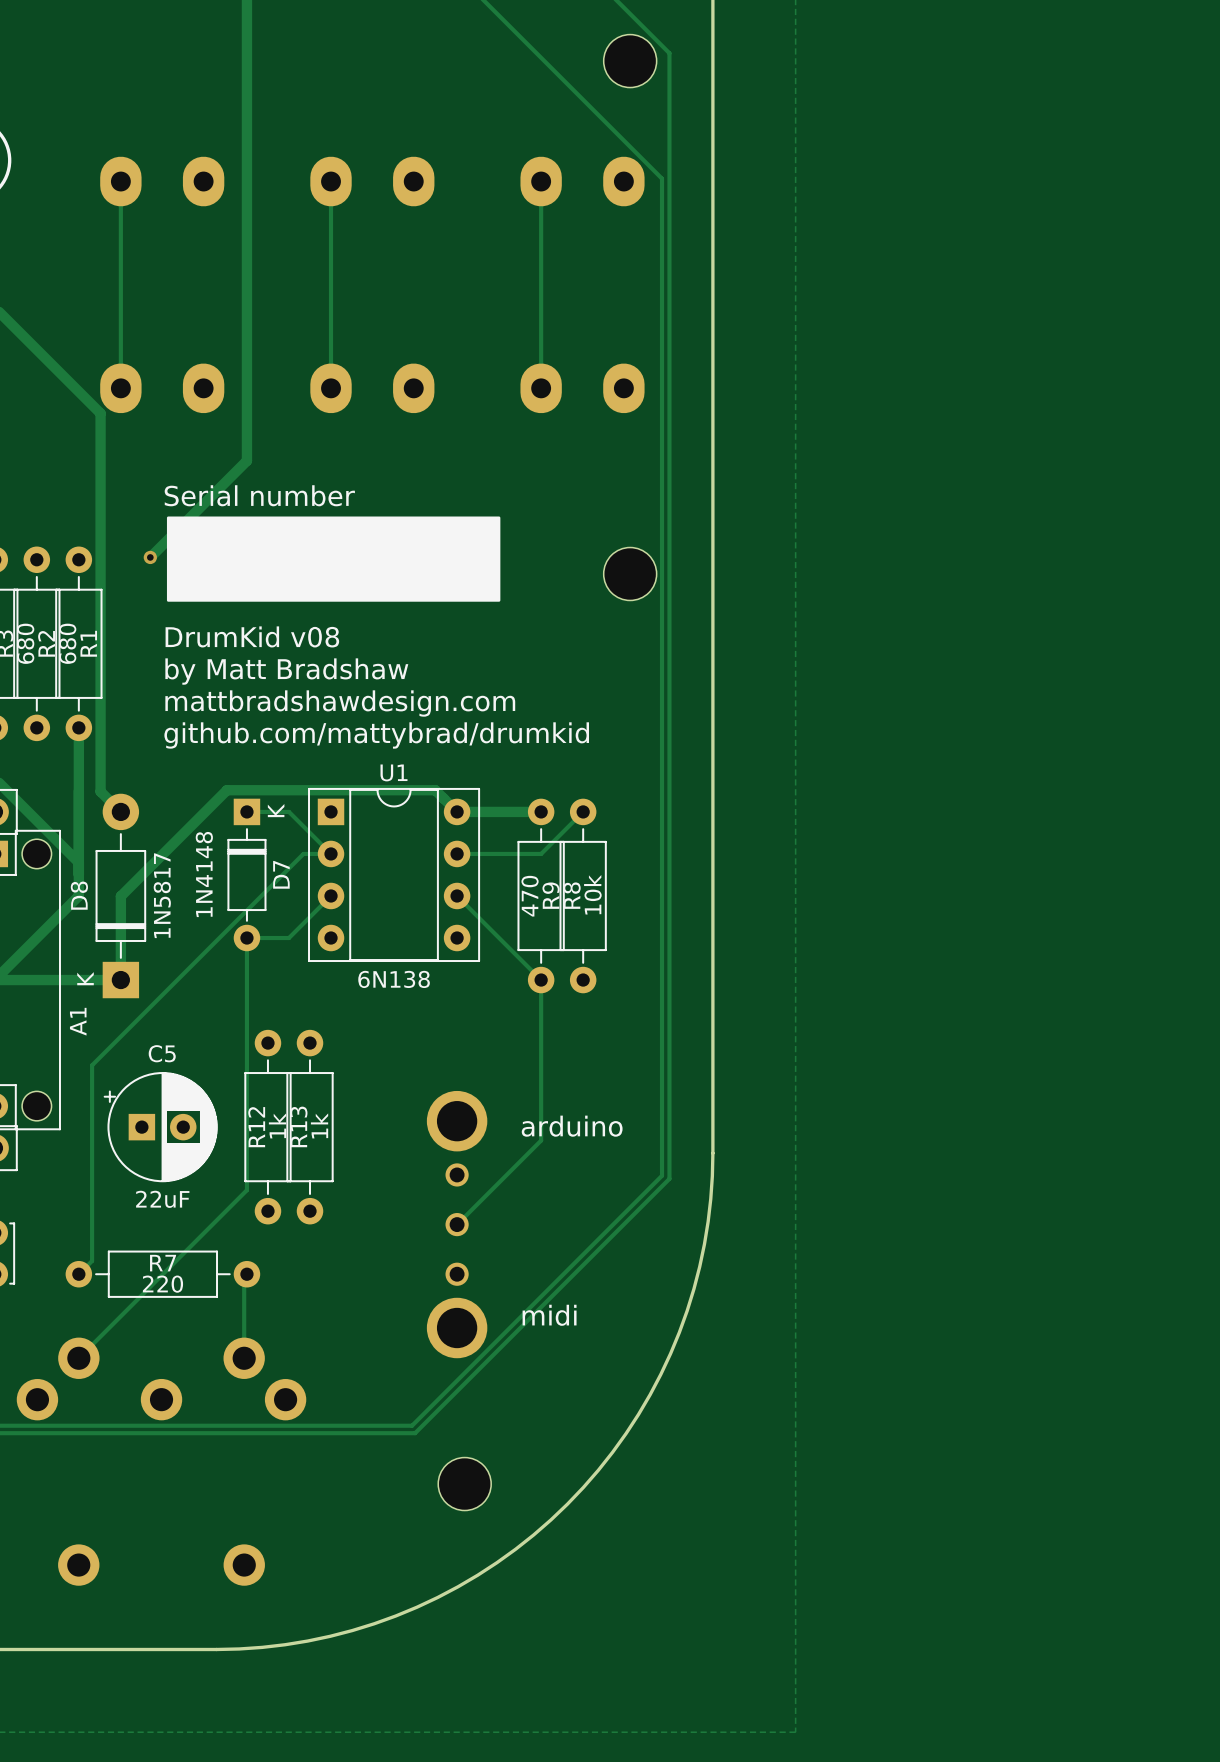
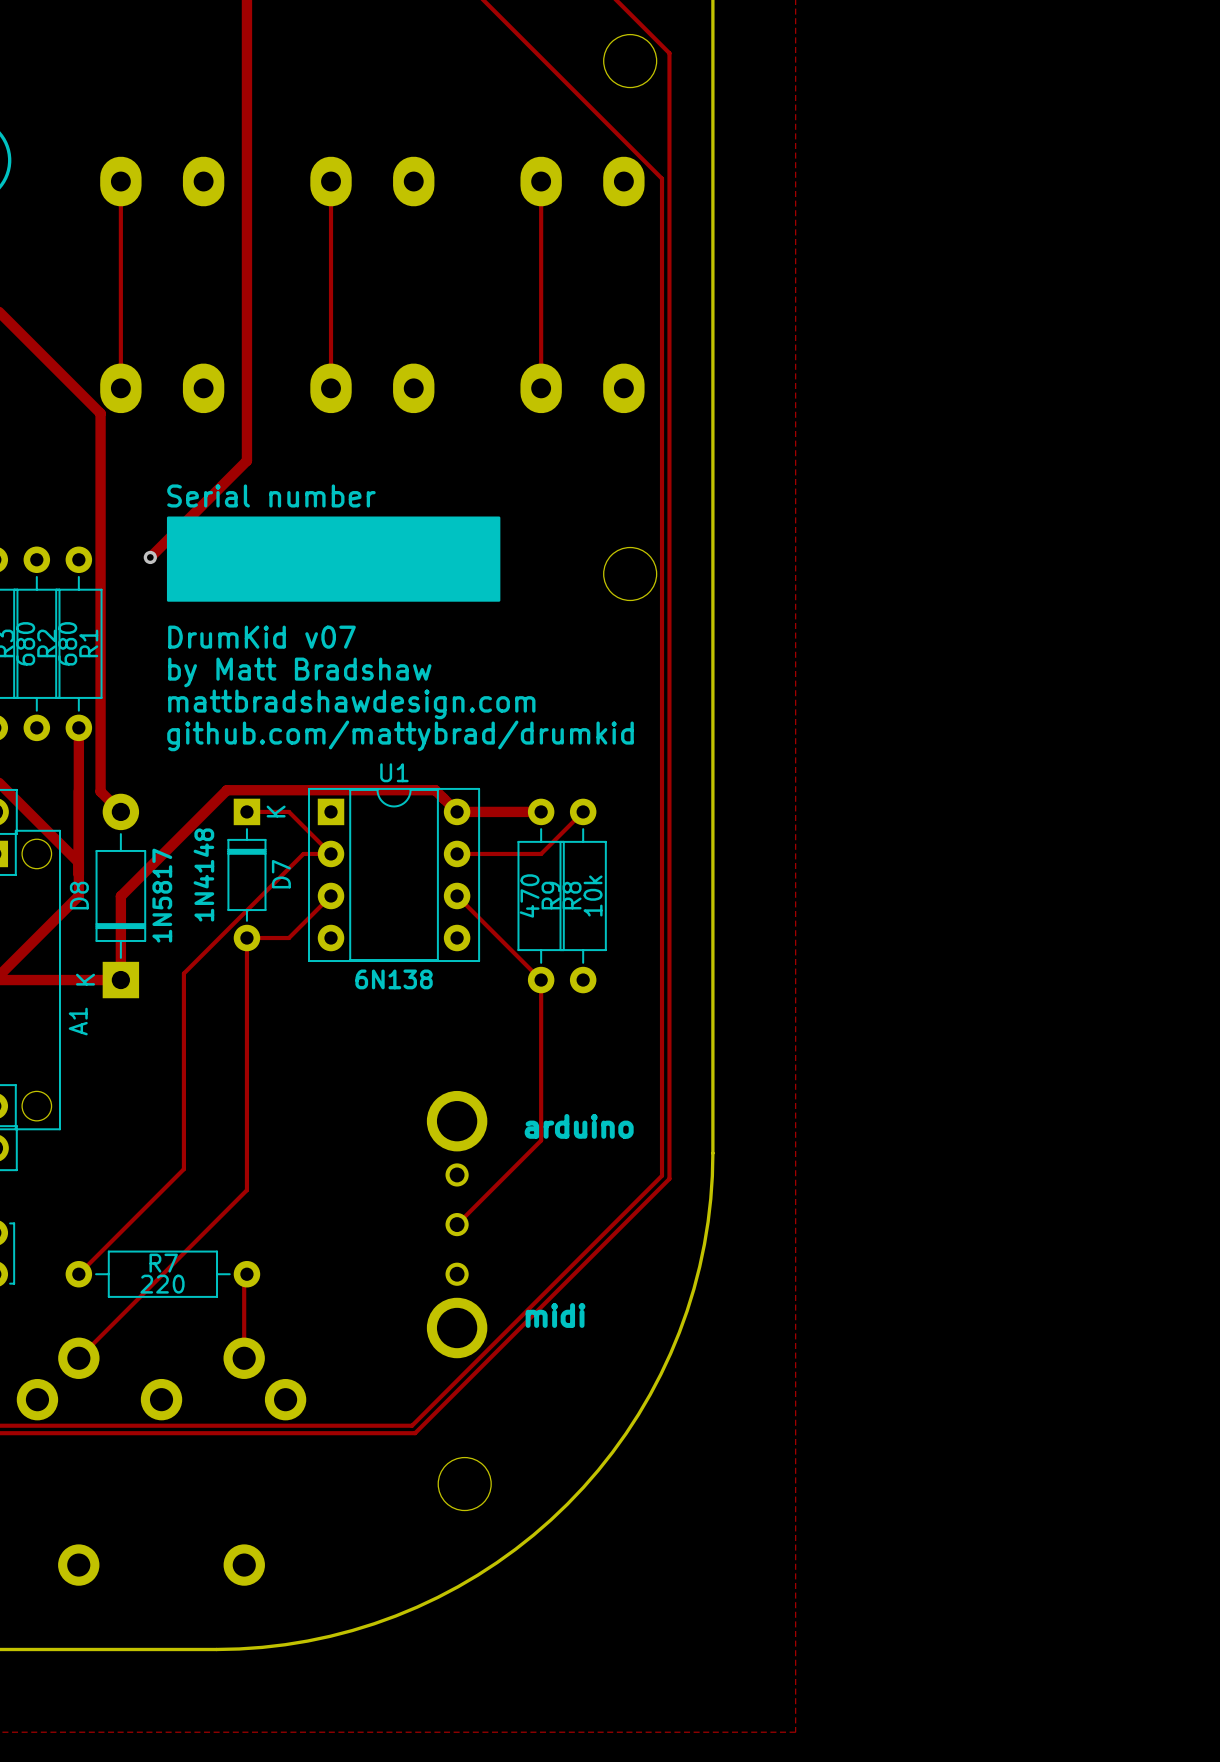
text: DrumKid v08 (252, 636) -> DrumKid v07 (261, 637)
track: (183, 973) (92, 1065) (92, 1260) -> (183, 973) (183, 1169) (92, 1260)
C5: 22uF (160, 1127) -> none
R12: 1k (267, 1127) -> none
R13: 1k (310, 1127) -> none

